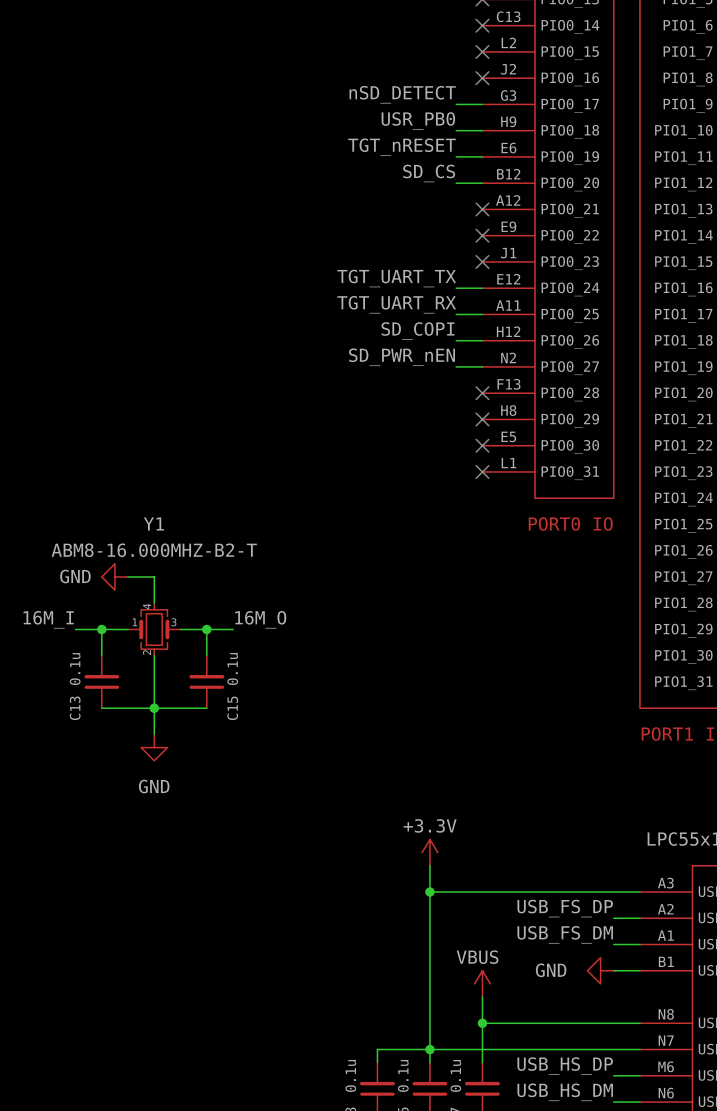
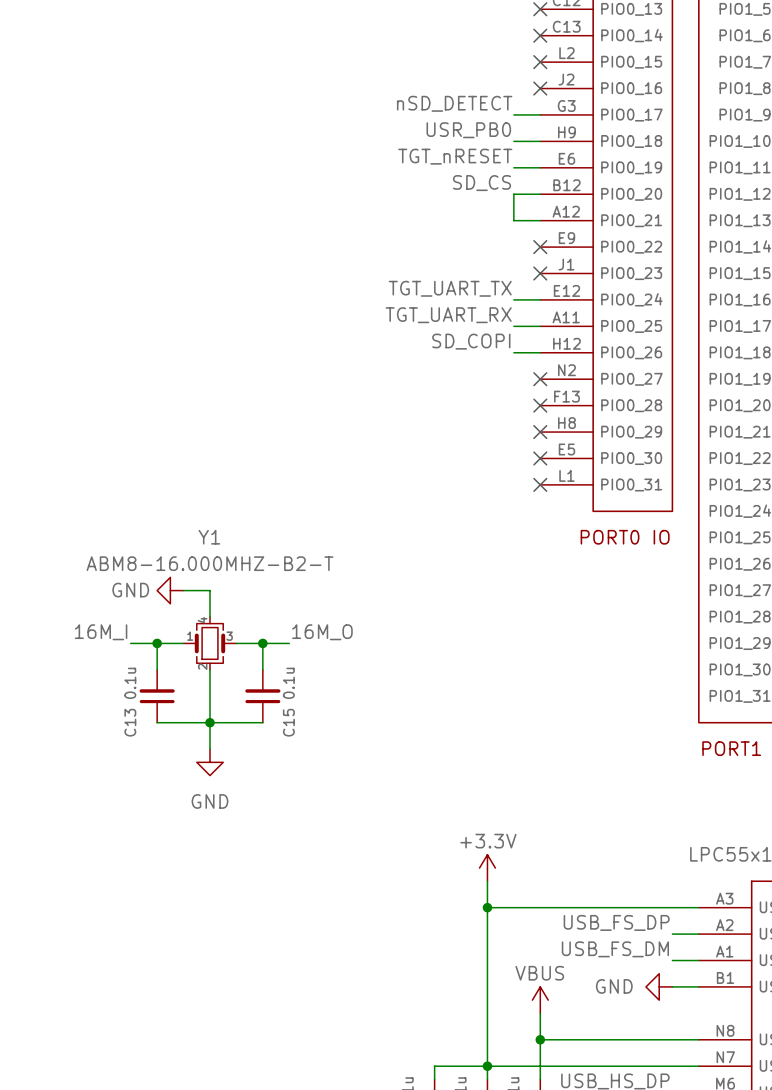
wire: none -> (513, 194) (513, 220) (540, 220)
no-connect mark: (482, 209) -> none
label: SD_PWR_nEN (402, 357) -> none
wire: (456, 366) (482, 366) -> none
no-connect mark: none -> (540, 379)

